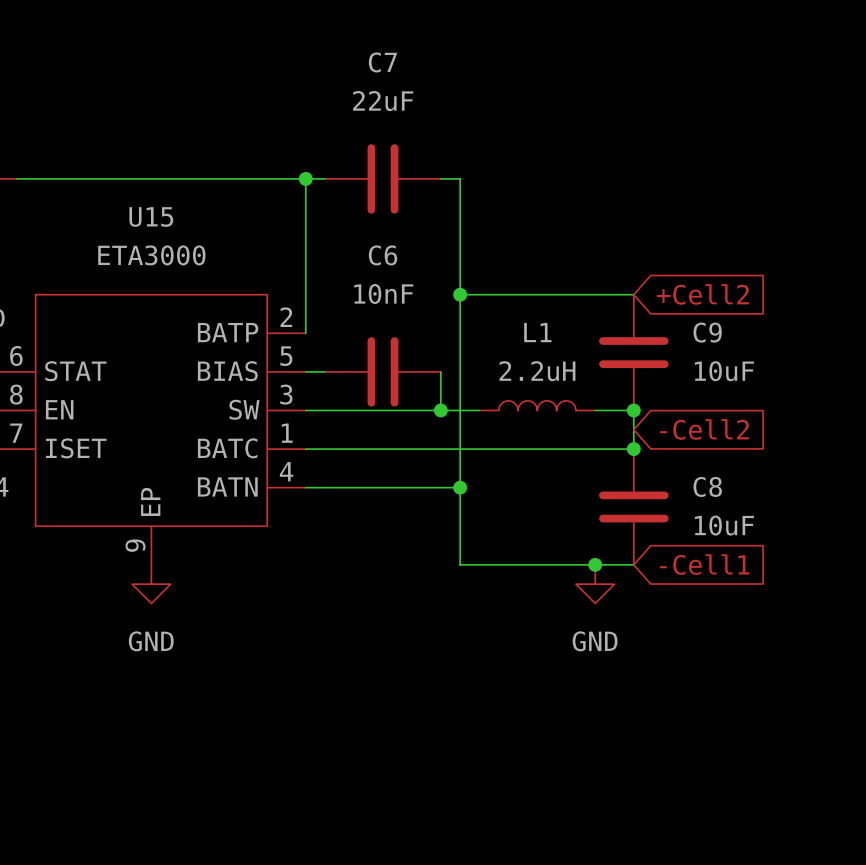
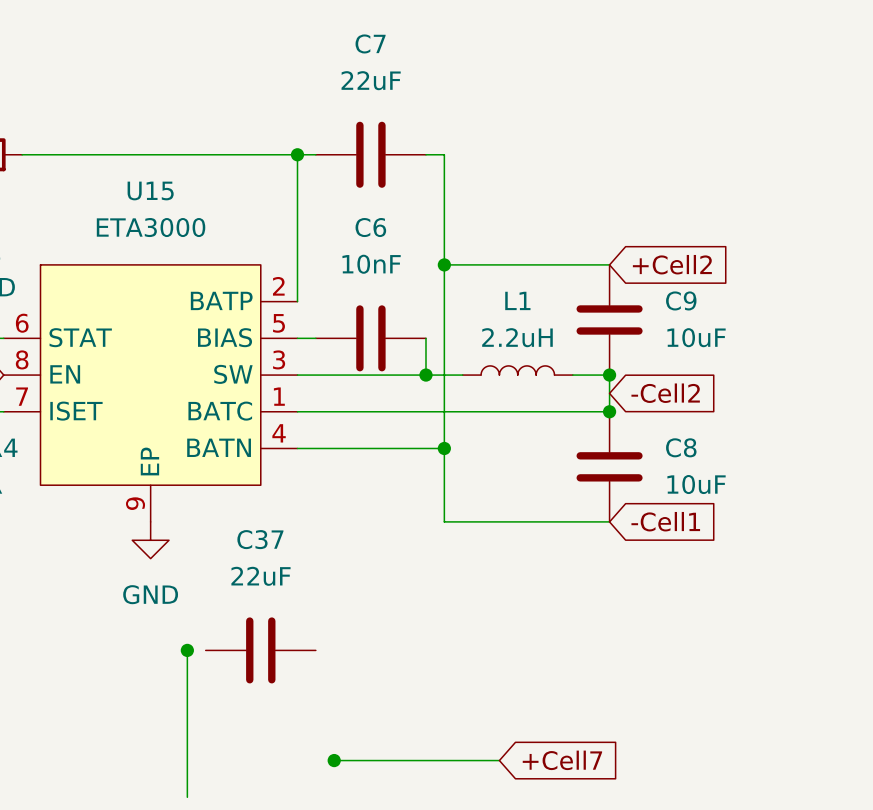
junction: (595, 564) -> none
power symbol: GND (595, 584) -> none
wire: none -> (187, 650) (187, 797)
junction: none -> (187, 650)
C37: none -> 22uF (260, 650)
wire: none -> (334, 760) (499, 760)
junction: none -> (334, 760)
global label: none -> +Cell7 (562, 760)

